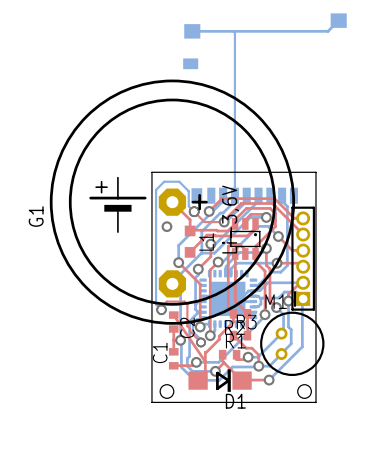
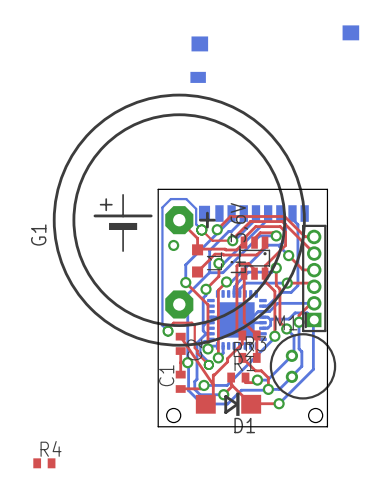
bottom track: (338, 20) (327, 31) (192, 31) -> none
bottom track: (233, 31) (234, 195) -> none
R4: none -> (44, 463)

